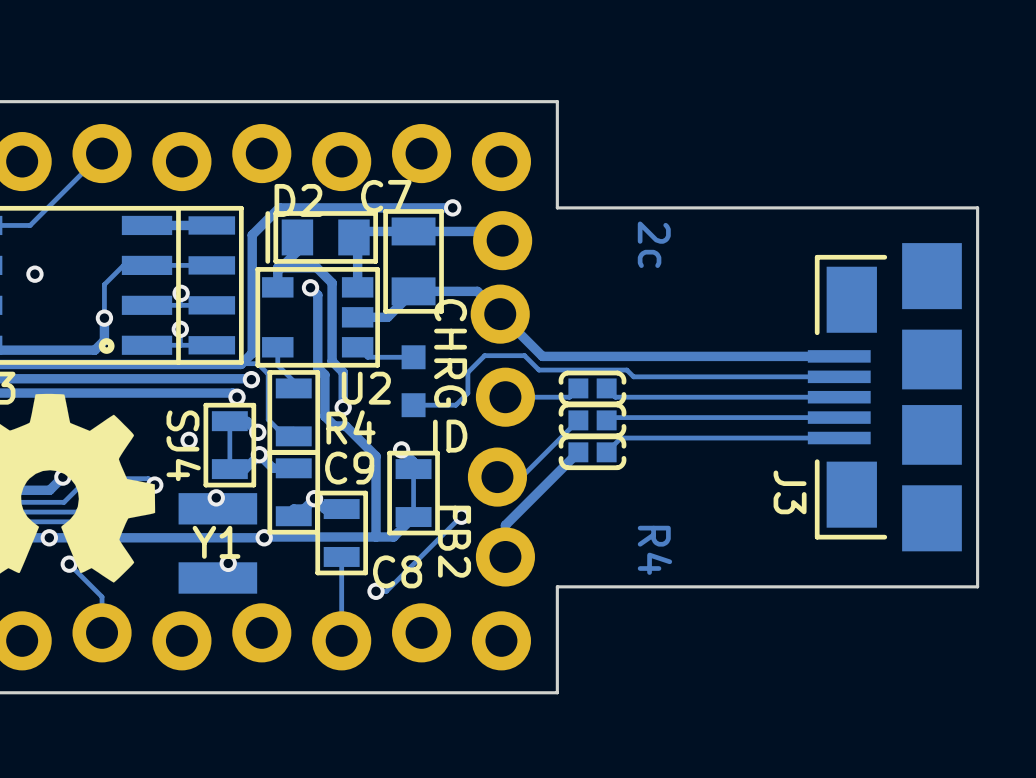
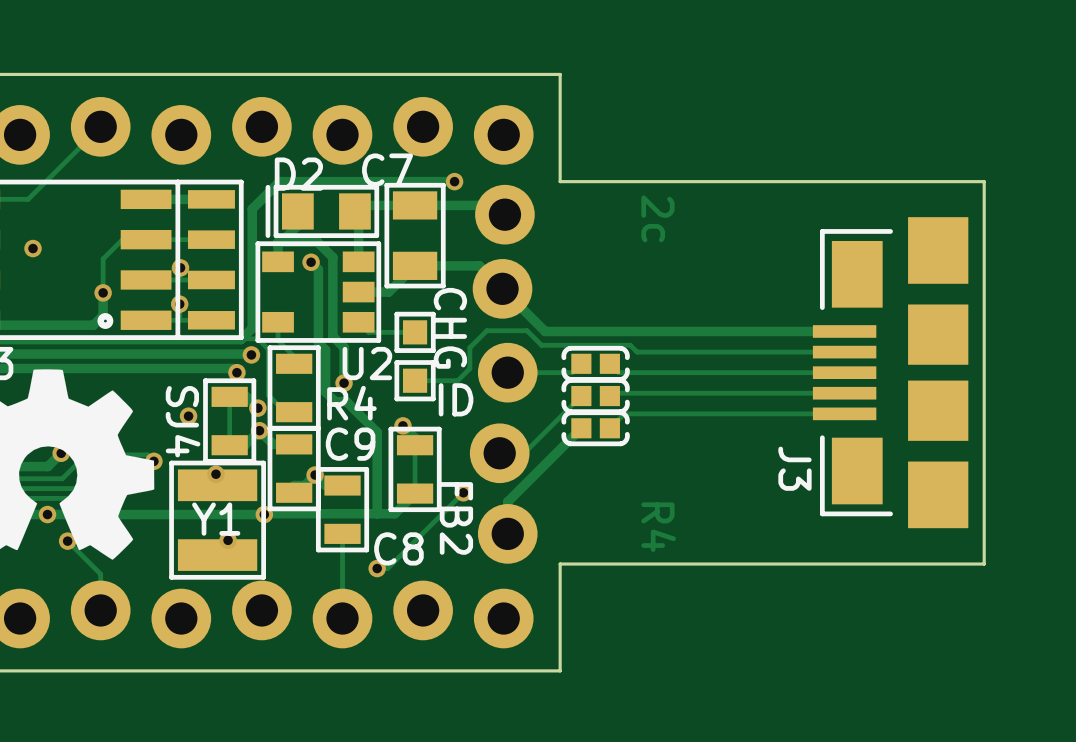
part footprint: [401, 345, 426, 370] -> [394, 311, 436, 353]
part value: CHRG (450, 353) -> CHG (450, 328)
part footprint: [401, 393, 426, 418] -> [394, 360, 436, 402]
Y1 footprint: [178, 493, 258, 594] -> [169, 460, 266, 580]

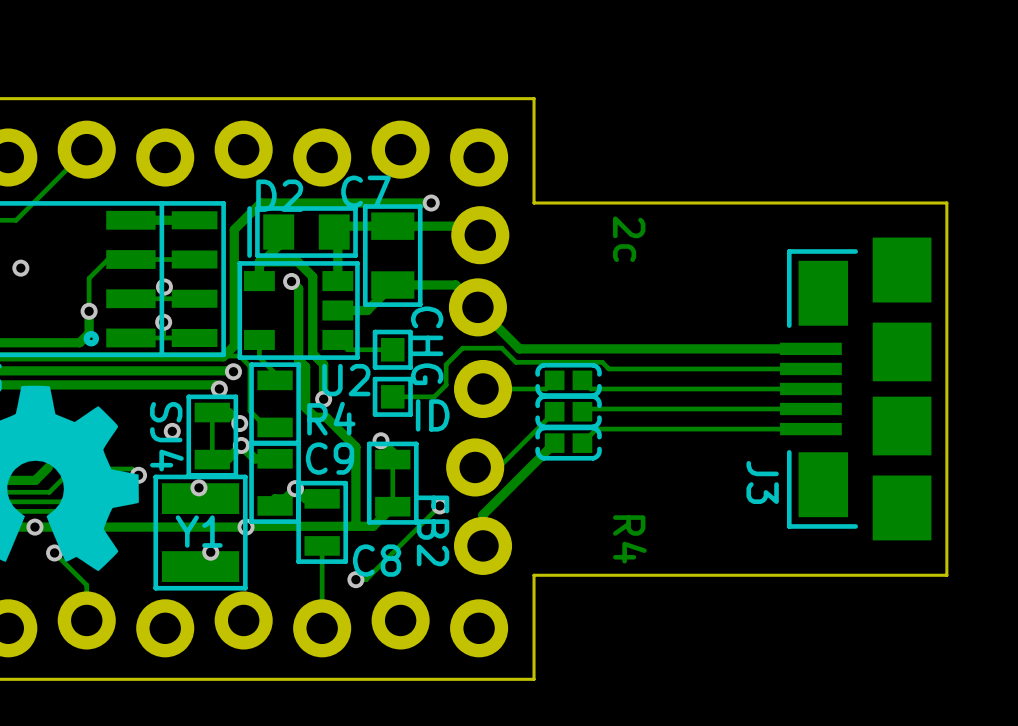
via: (61, 453) -> none

